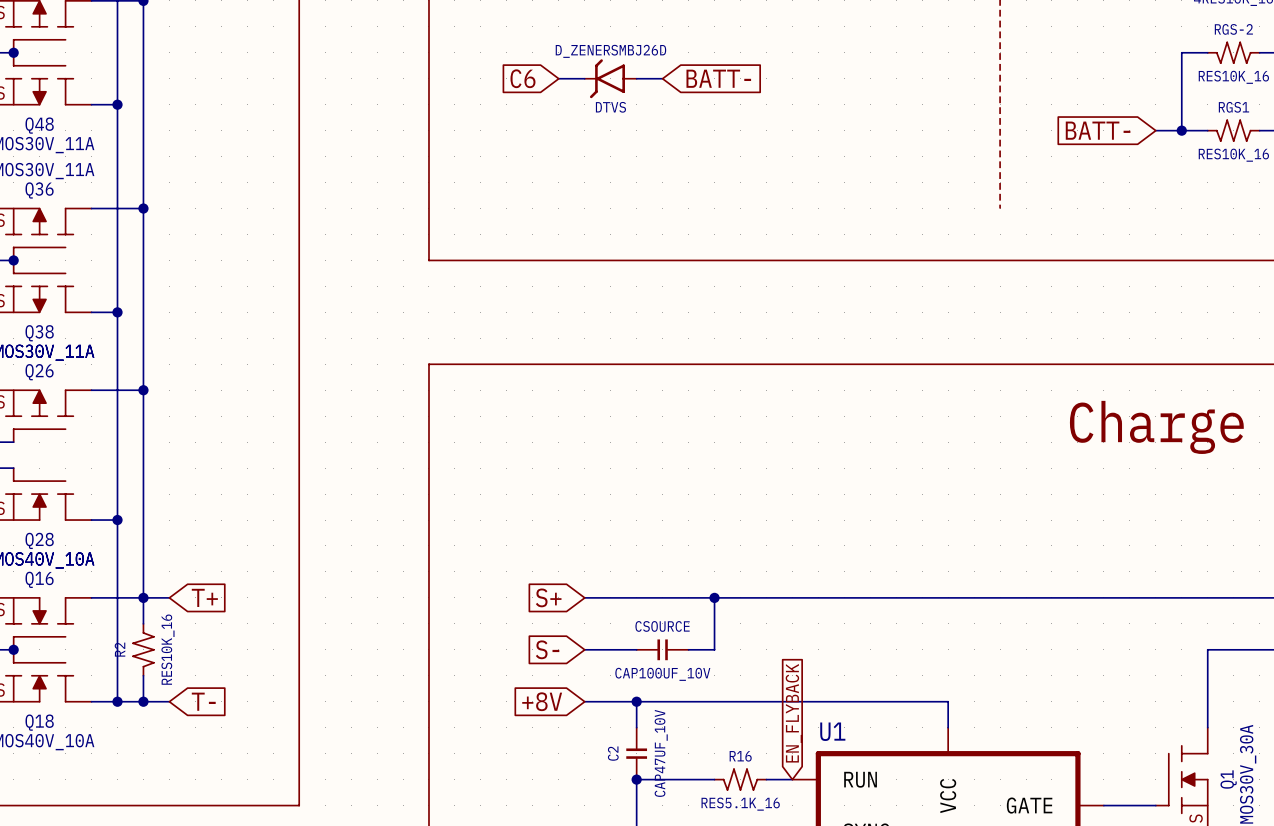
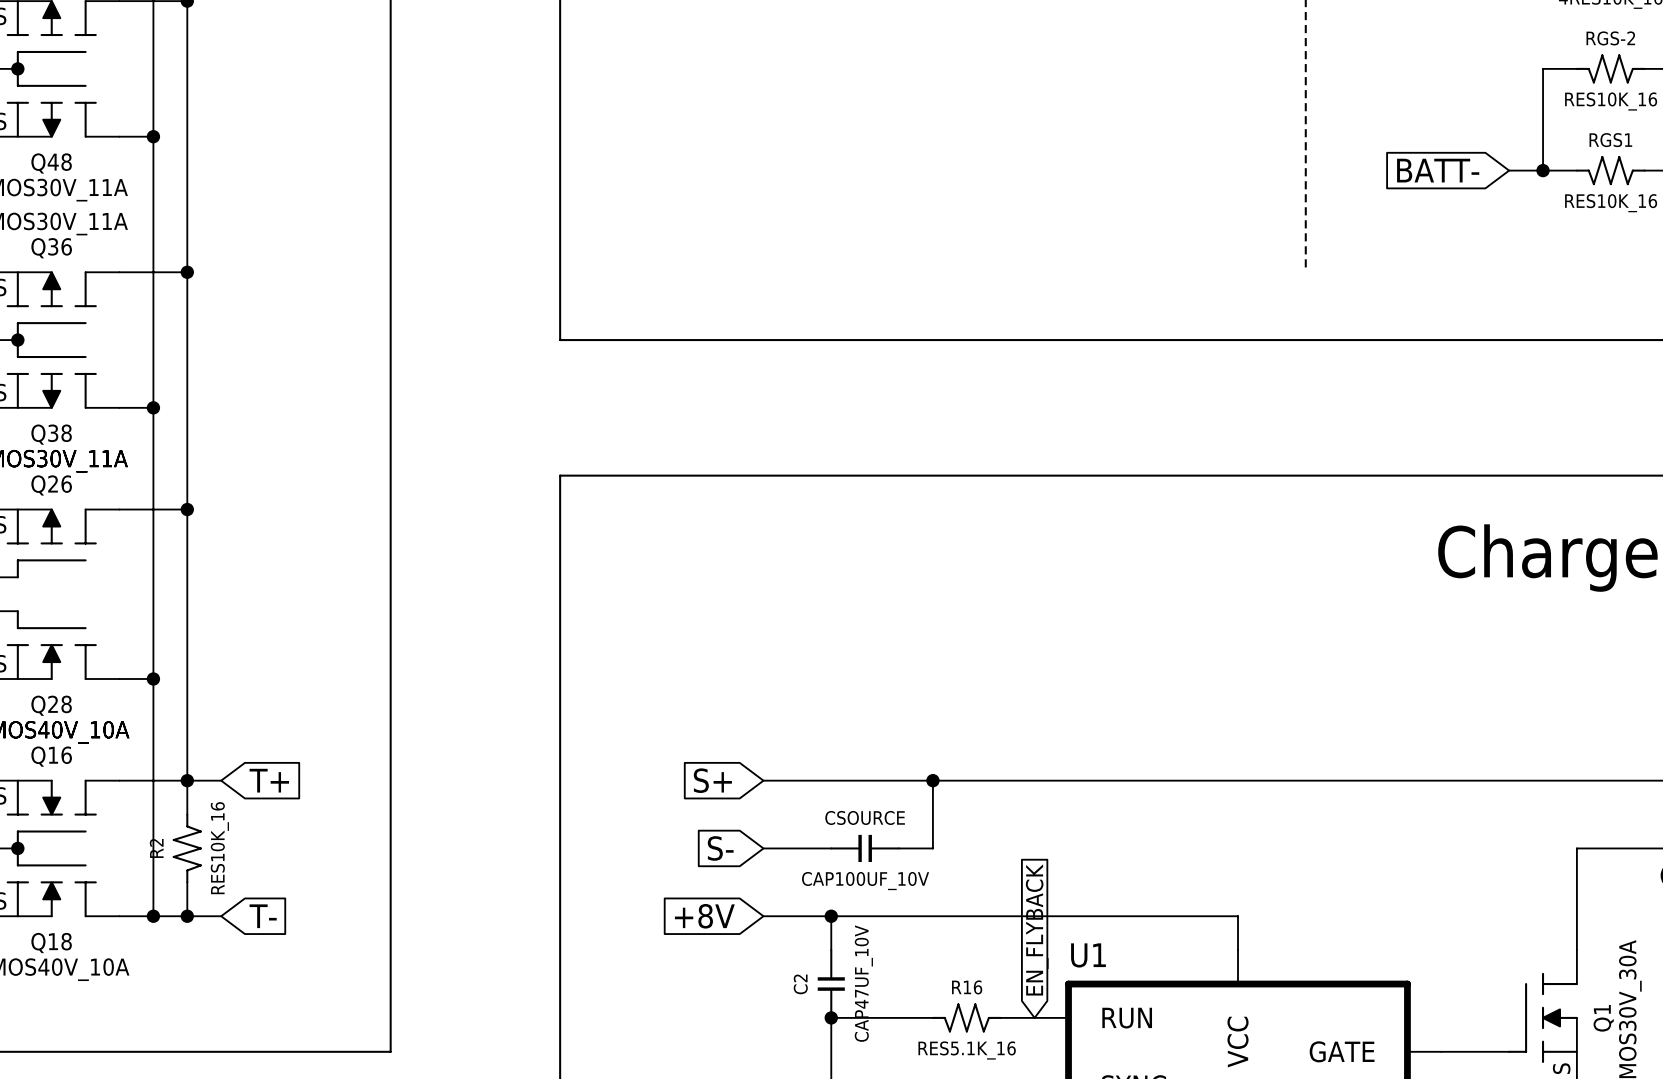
global label: C6 (522, 78) -> none
wire: (558, 78) (584, 78) -> none
DTVS: D_ZENERSMBJ26D (610, 78) -> none
wire: (636, 78) (662, 78) -> none
global label: BATT- (718, 78) -> none

